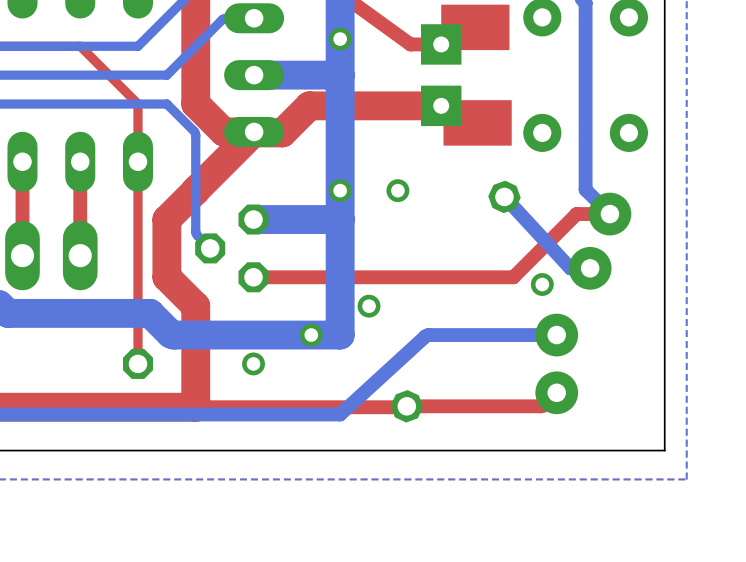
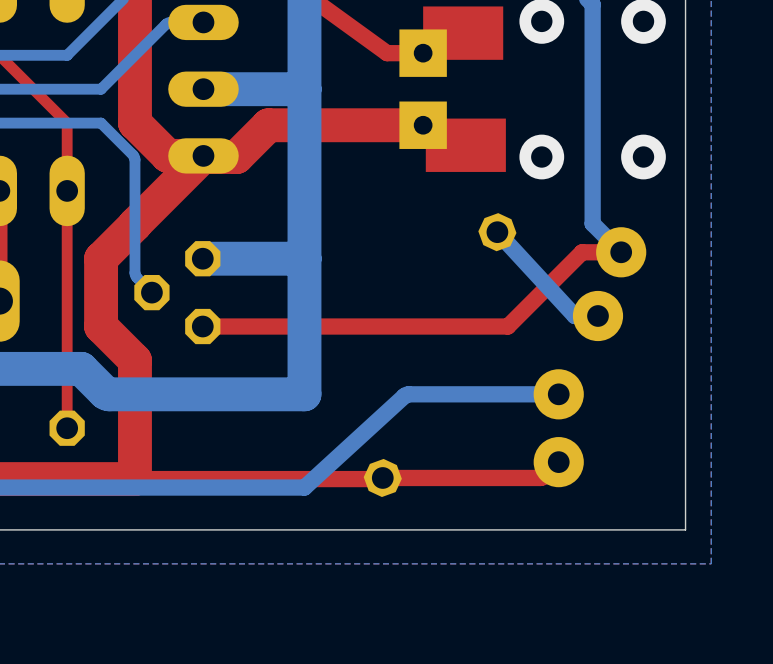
via: (340, 39) -> none
via: (340, 190) -> none
via: (397, 190) -> none
via: (542, 284) -> none
via: (369, 306) -> none
via: (311, 335) -> none
via: (253, 363) -> none

